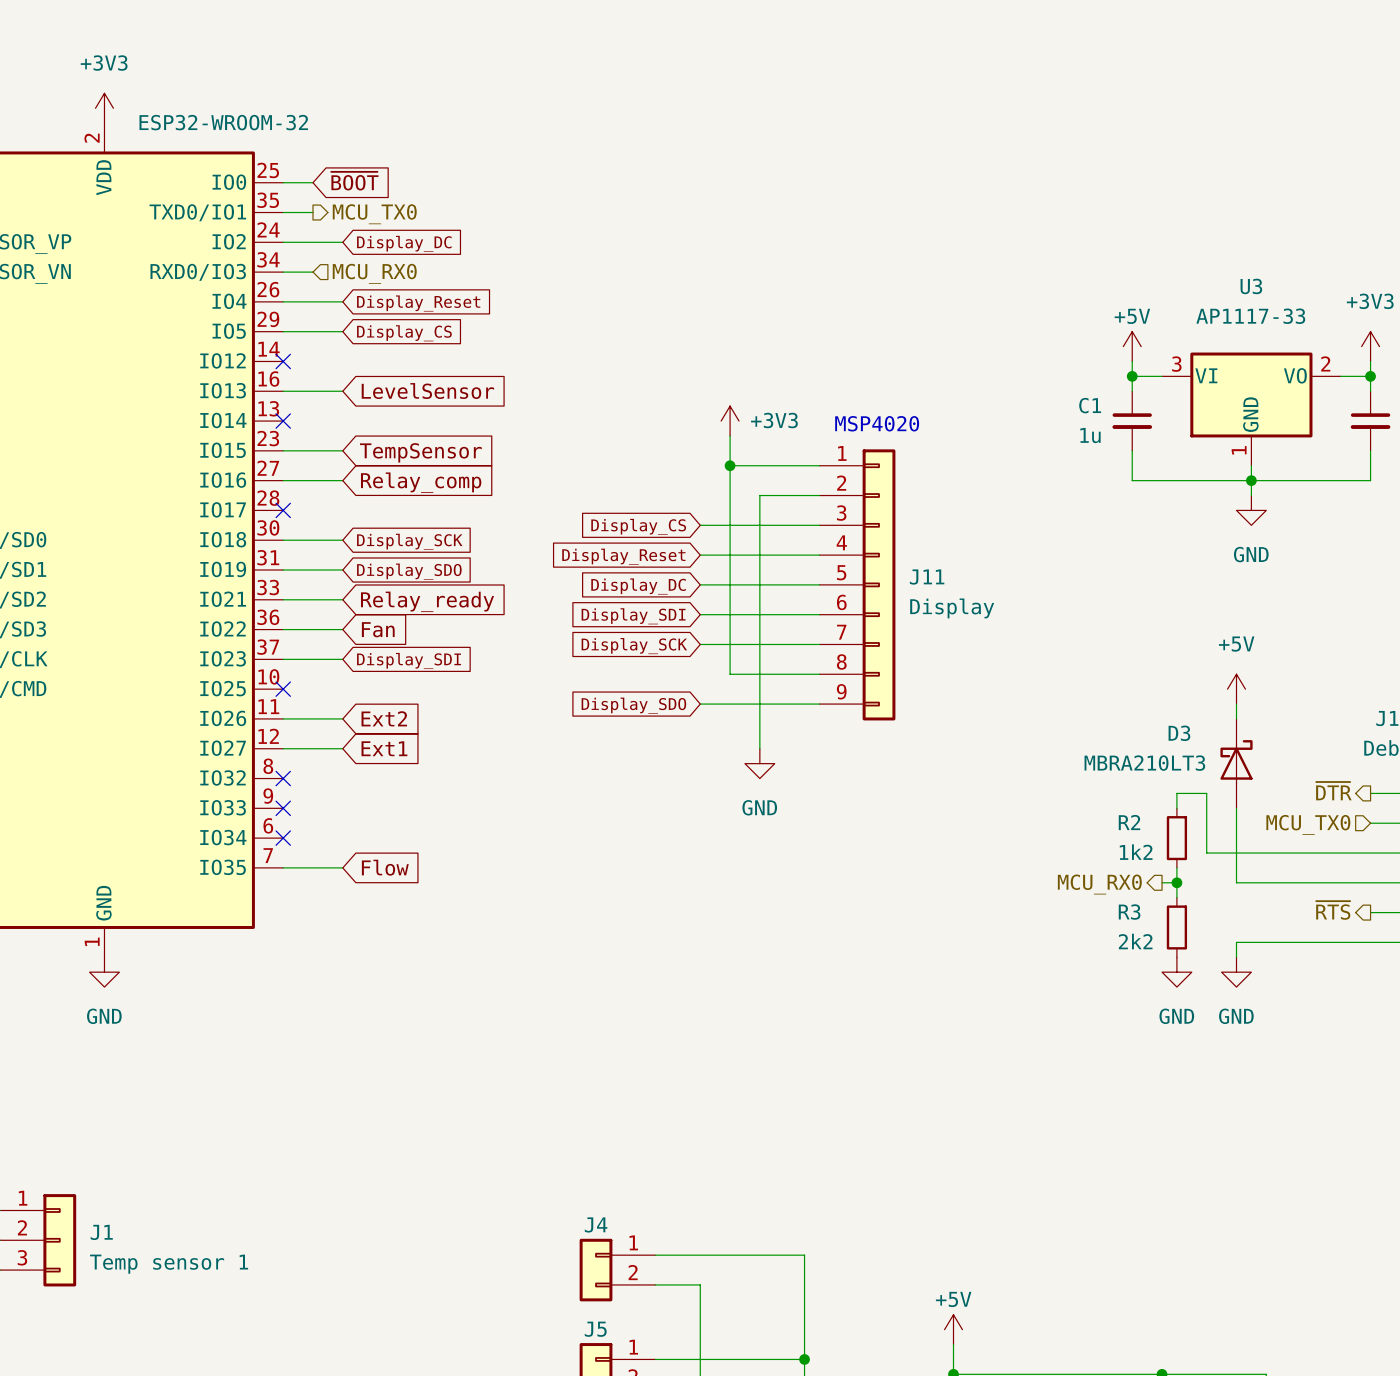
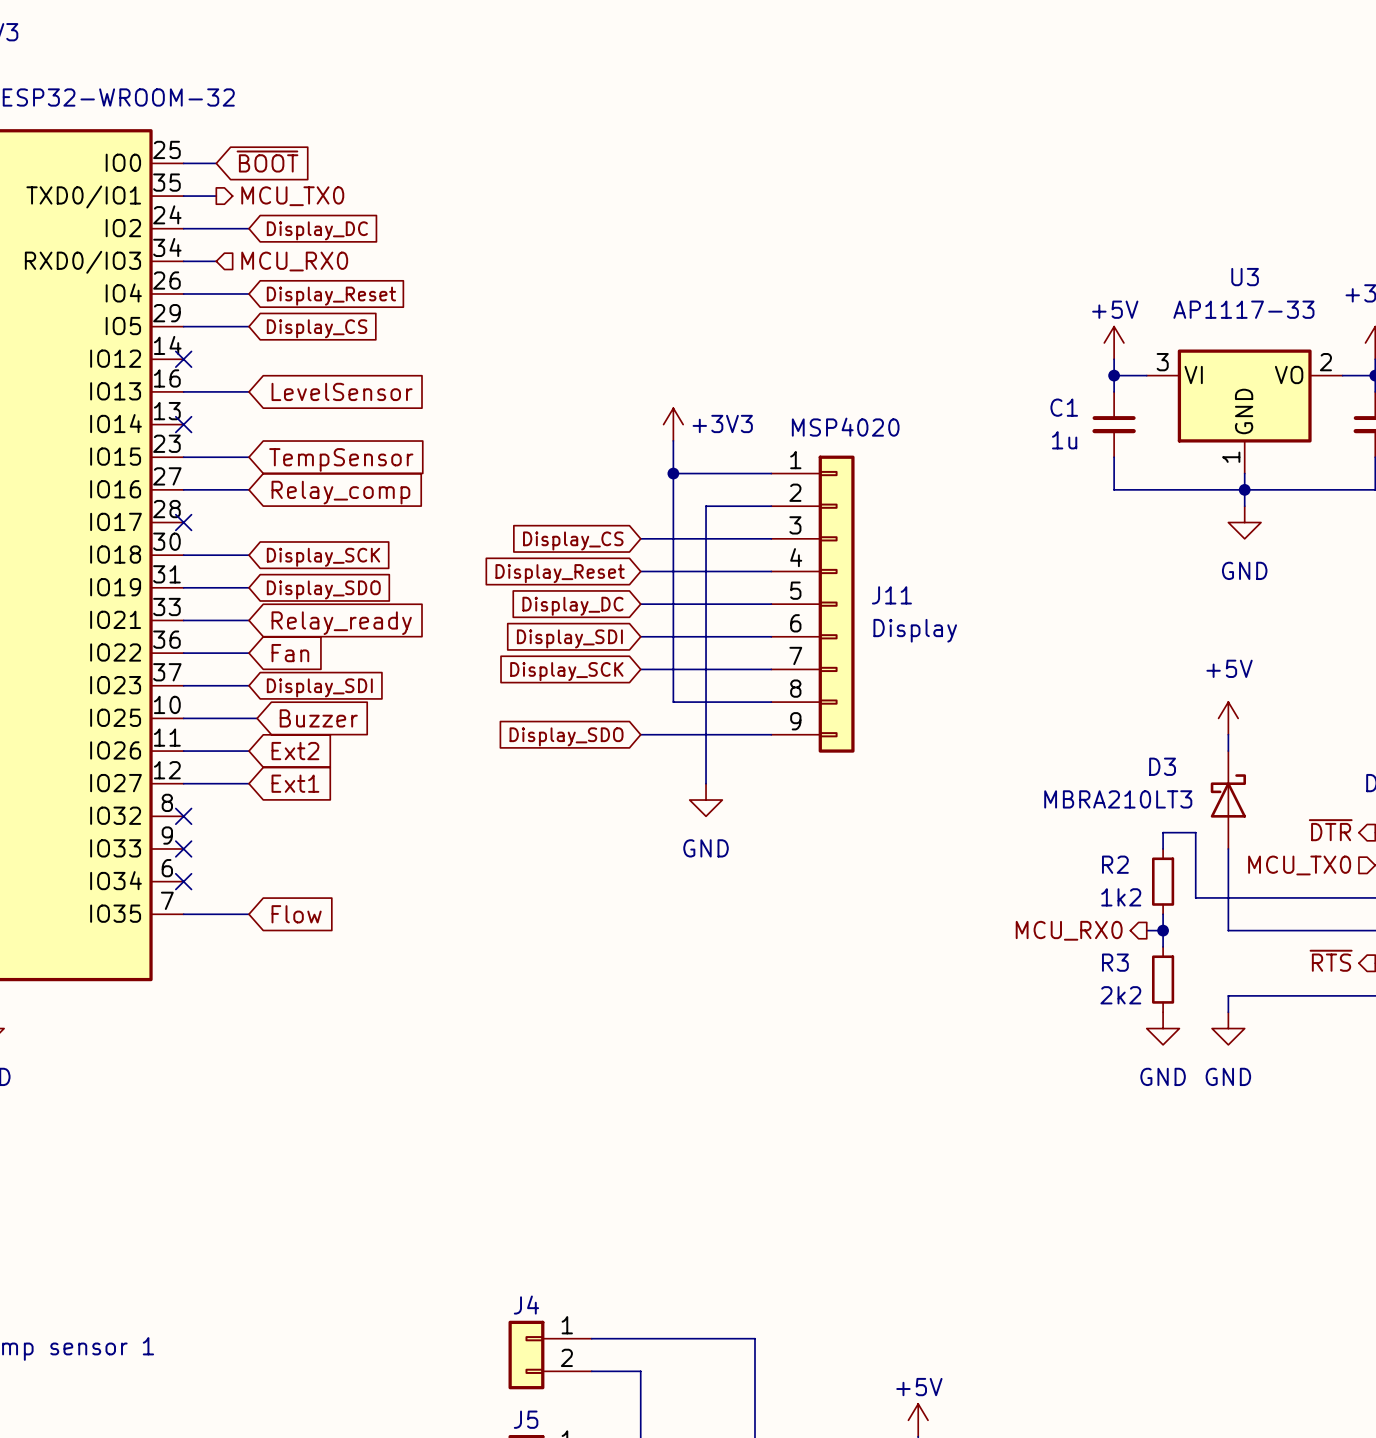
wire: none -> (183, 718) (257, 718)
no-connect mark: (283, 689) -> none
global label: none -> Buzzer (318, 718)

